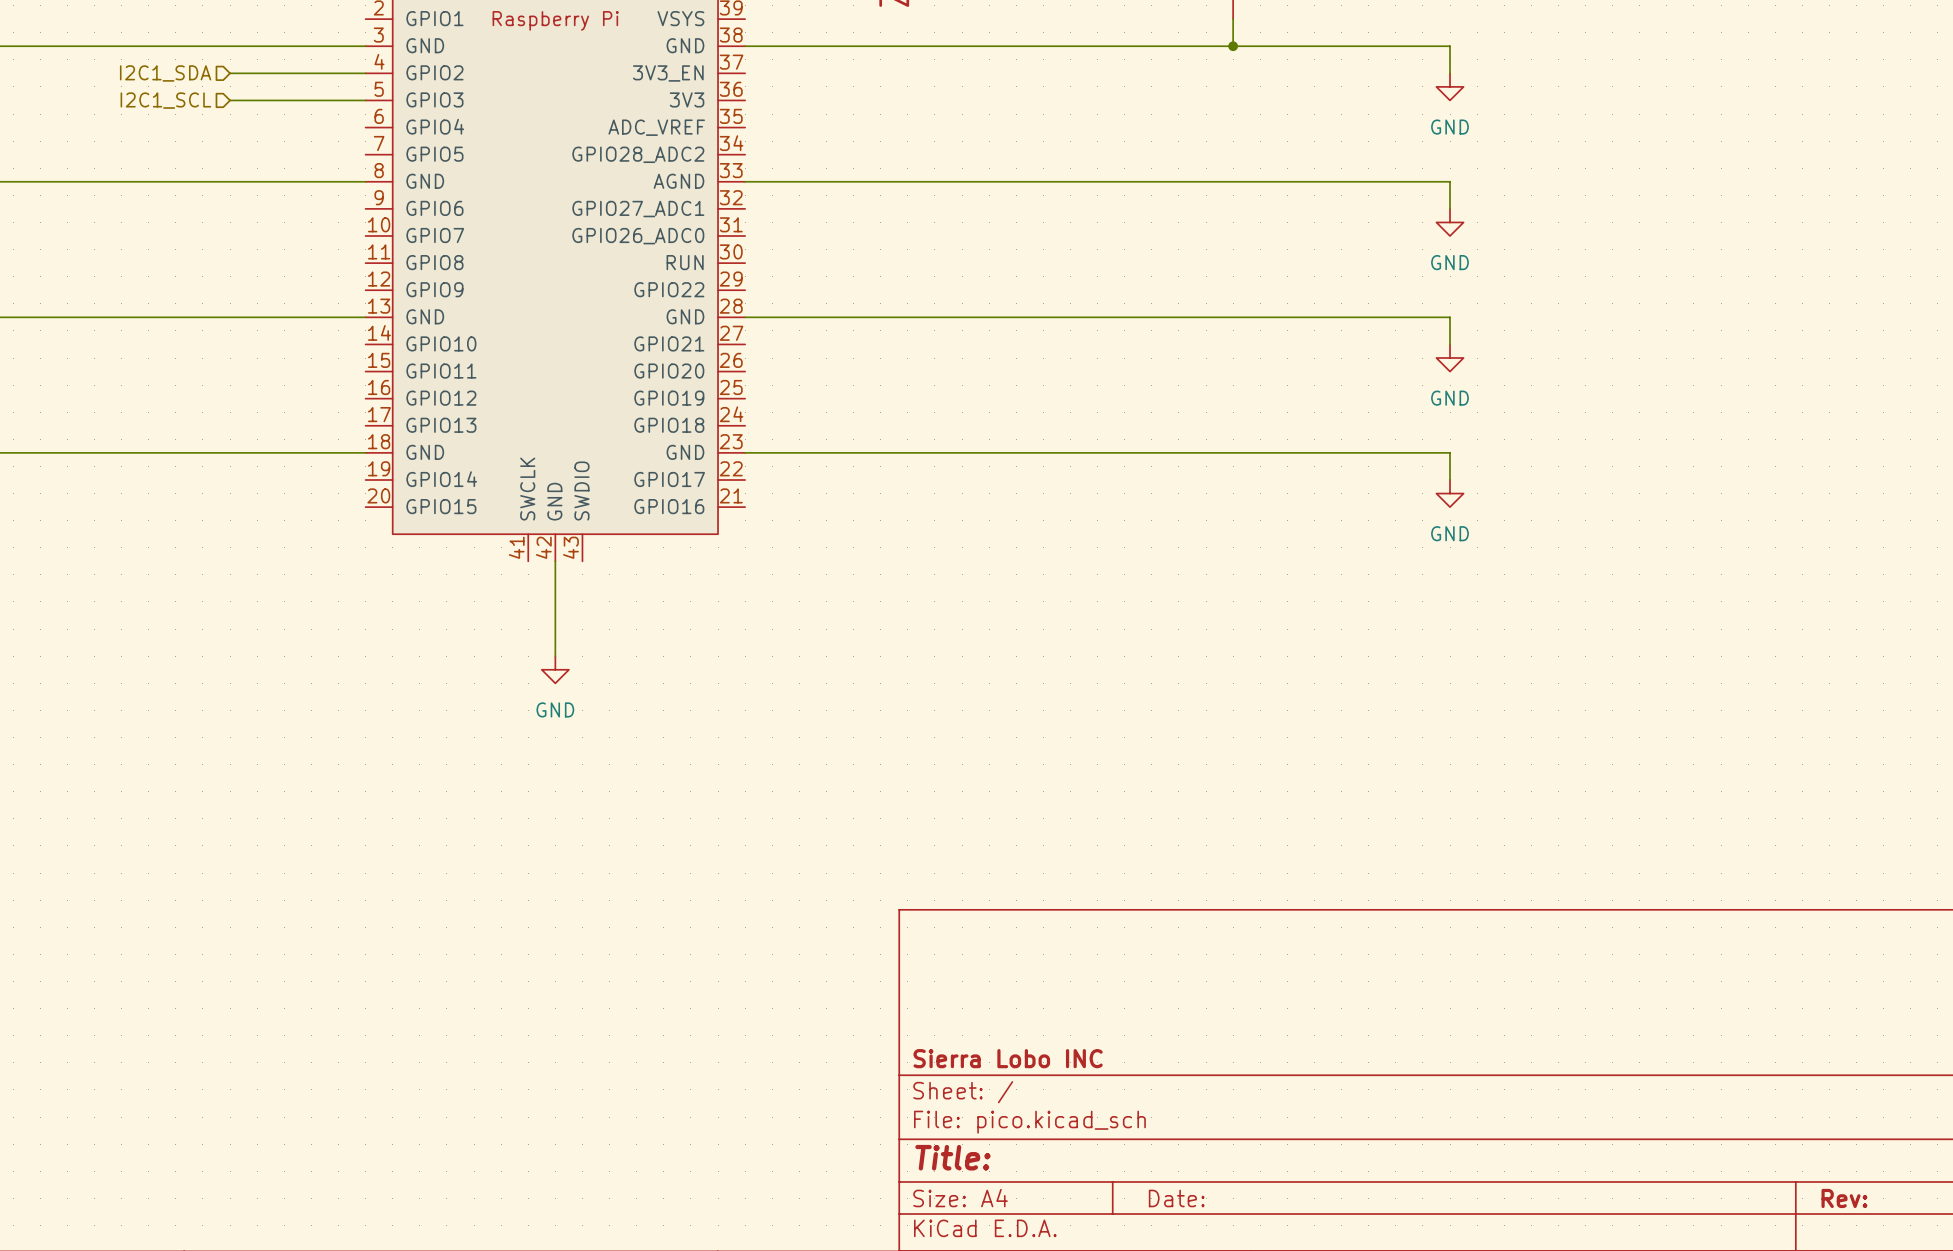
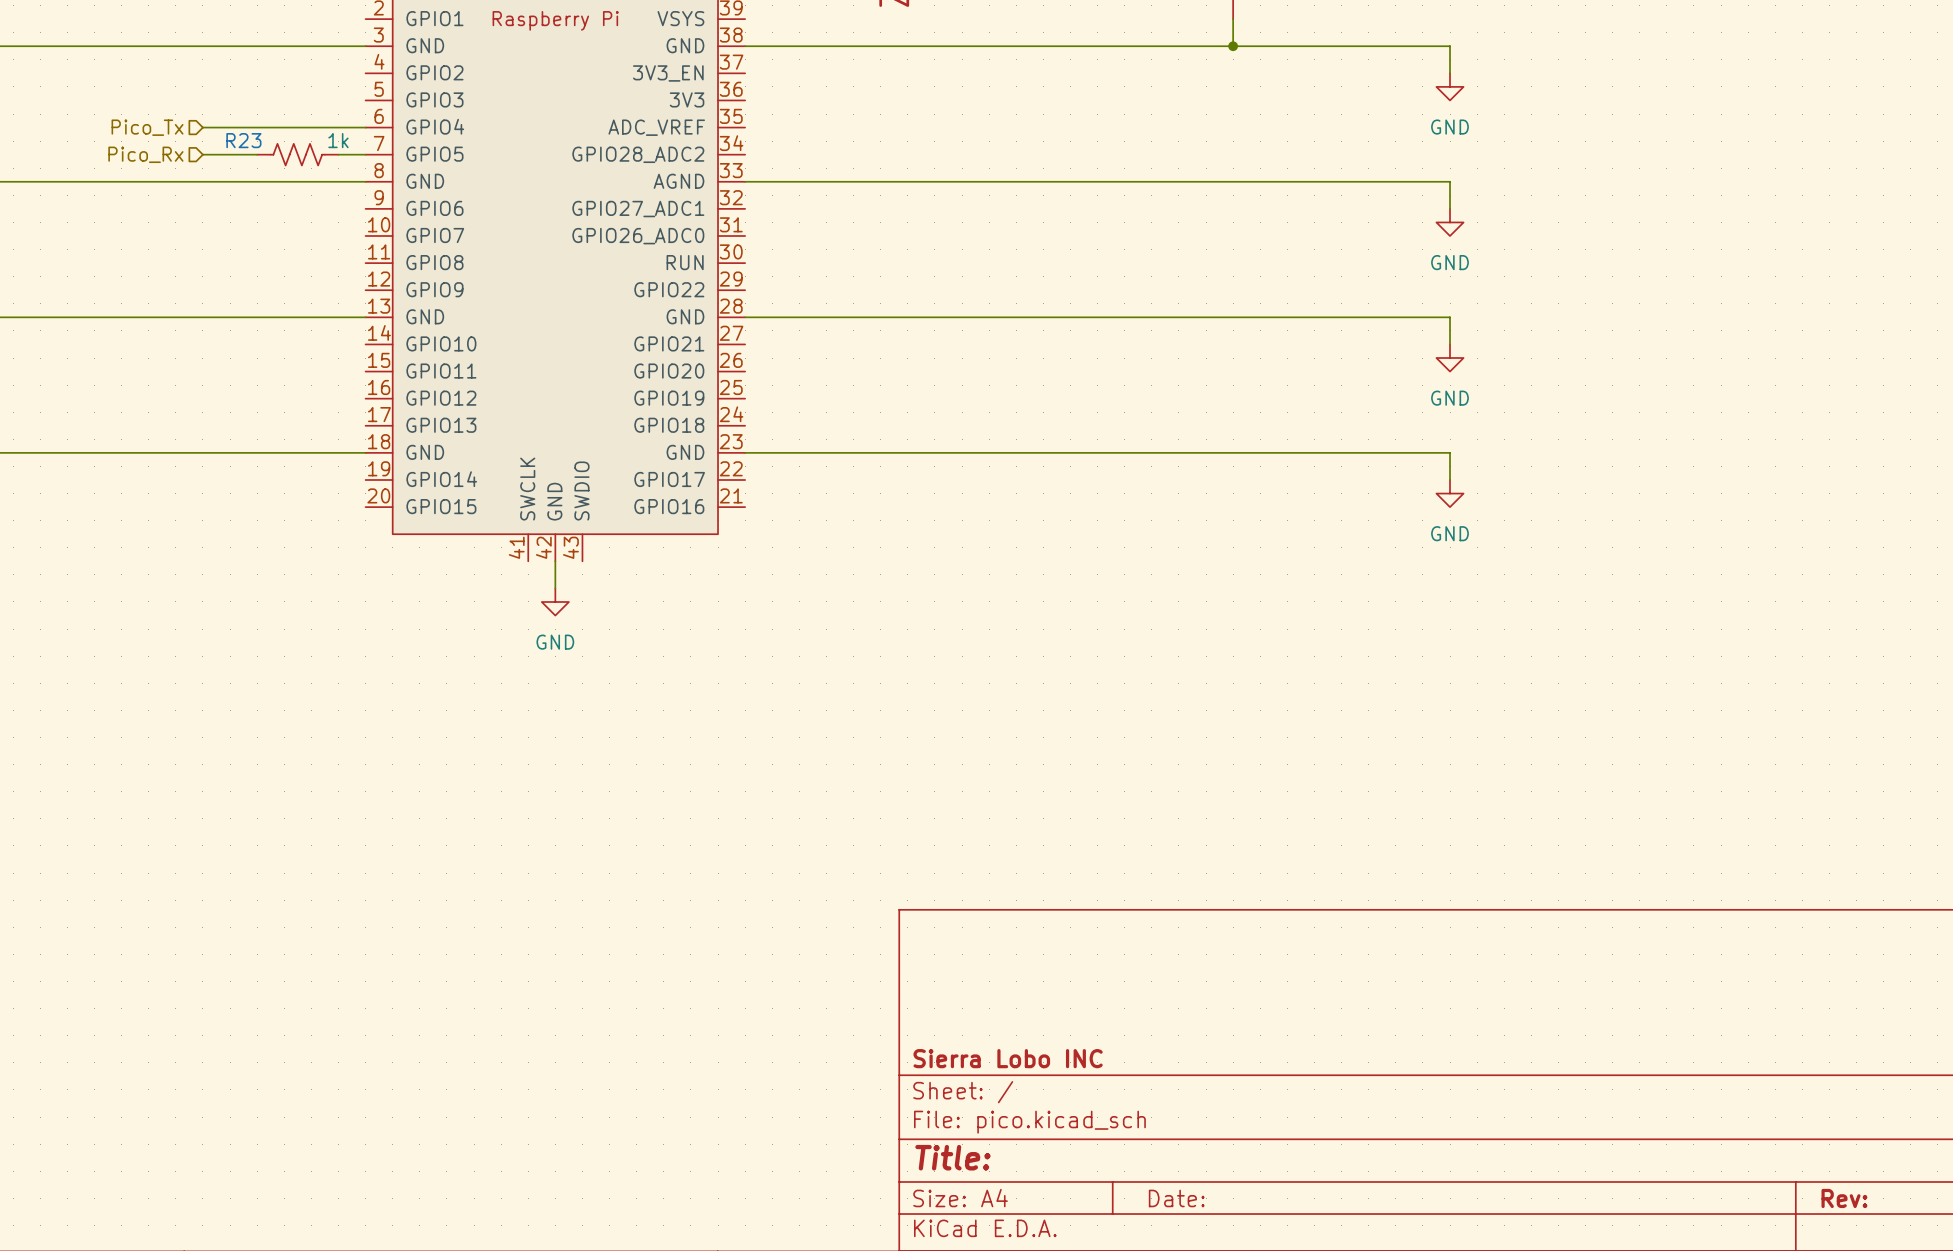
hierarchical label: I2C1_SDA (165, 73) -> none
wire: (230, 73) (365, 73) -> none
hierarchical label: I2C1_SCL (165, 100) -> none
wire: (230, 100) (365, 100) -> none
hierarchical label: none -> Pico_Tx (147, 127)
wire: none -> (202, 127) (365, 127)
hierarchical label: none -> Pico_Rx (145, 154)
wire: none -> (202, 154) (257, 154)
R23: none -> 1k (297, 154)
wire: none -> (338, 154) (365, 154)
wire: (555, 588) (555, 656) -> none
power symbol position: GND (555, 669) -> GND (555, 601)

